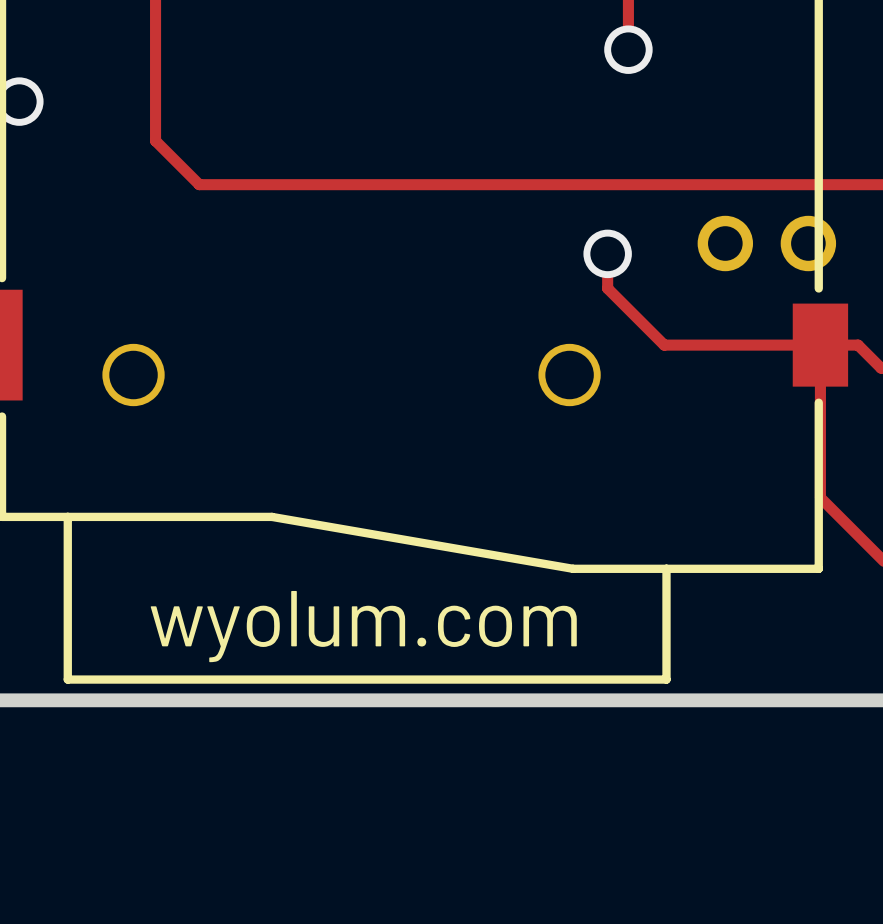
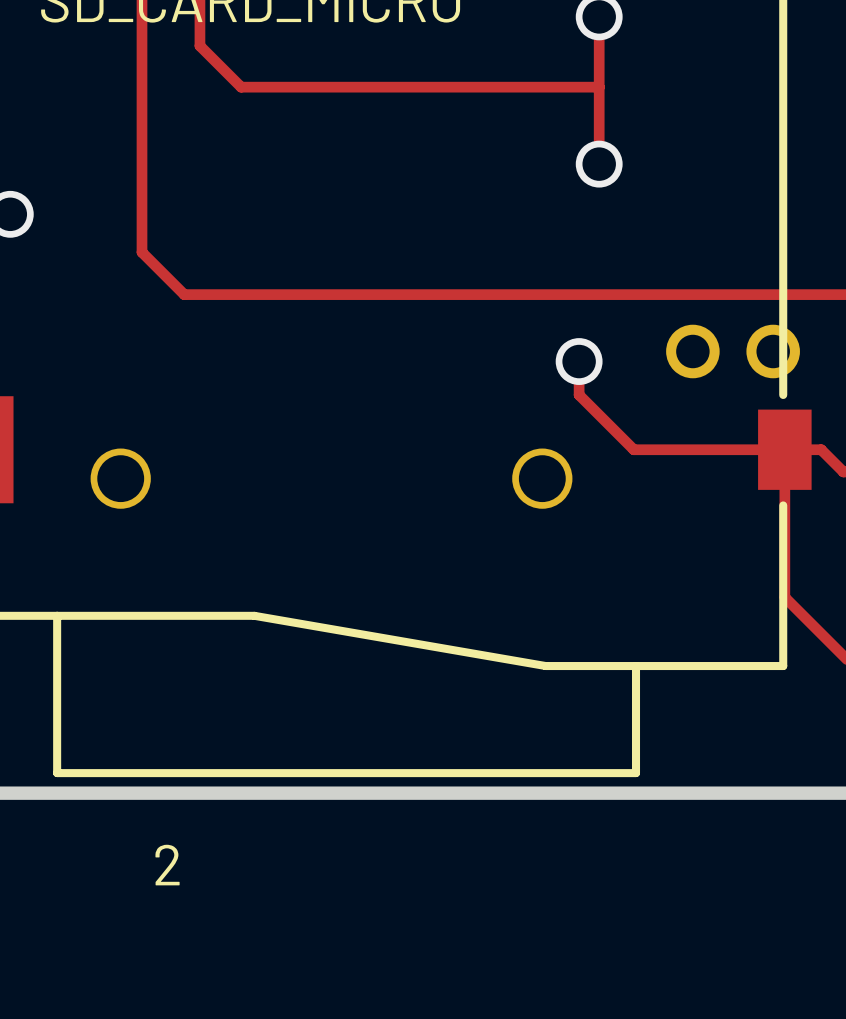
text: wyolum.com (363, 626) -> none
text: none -> 2 (167, 865)

